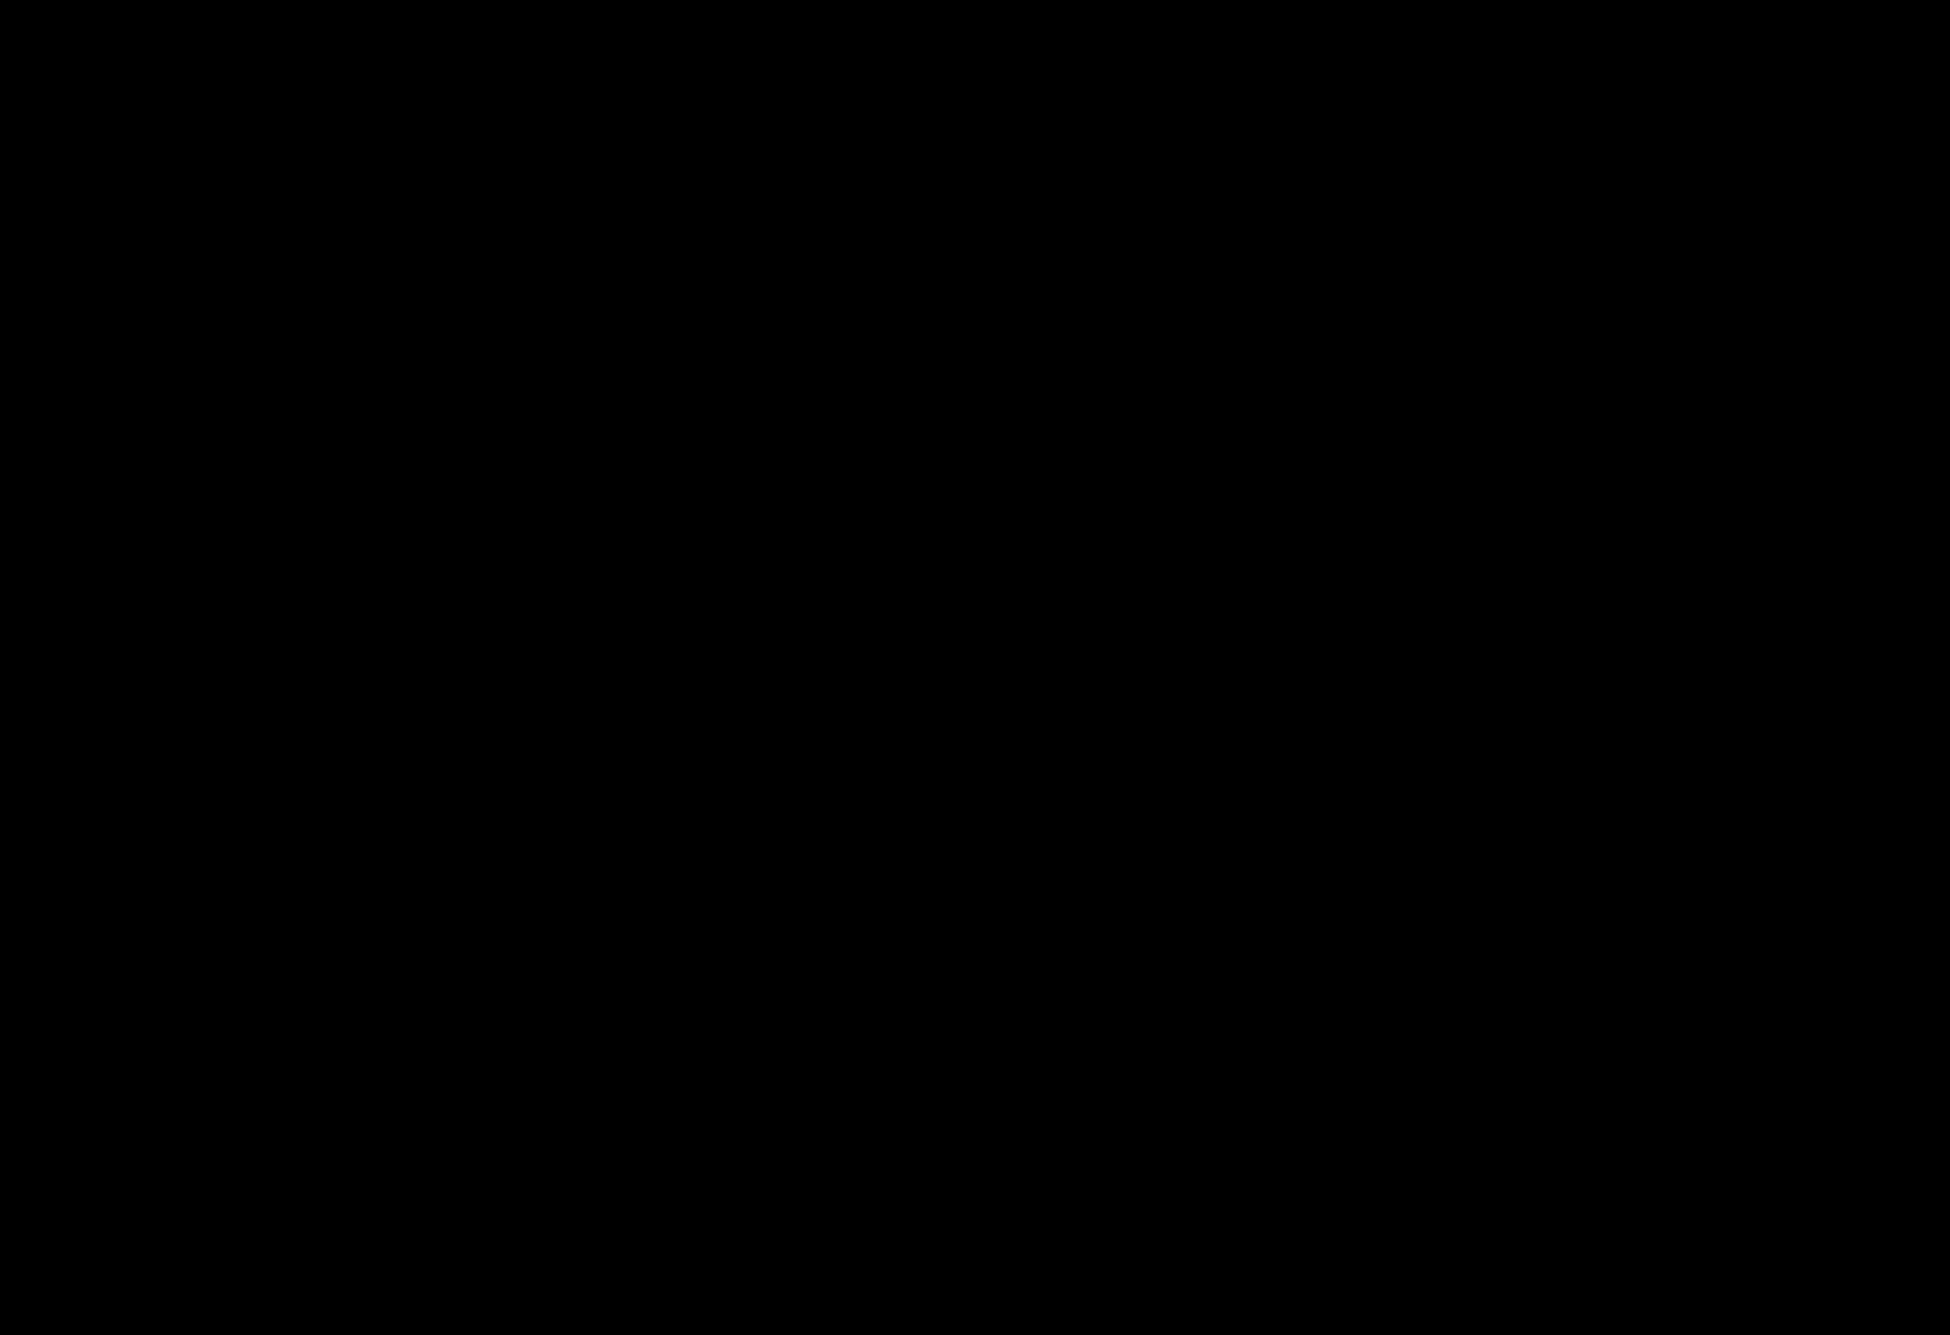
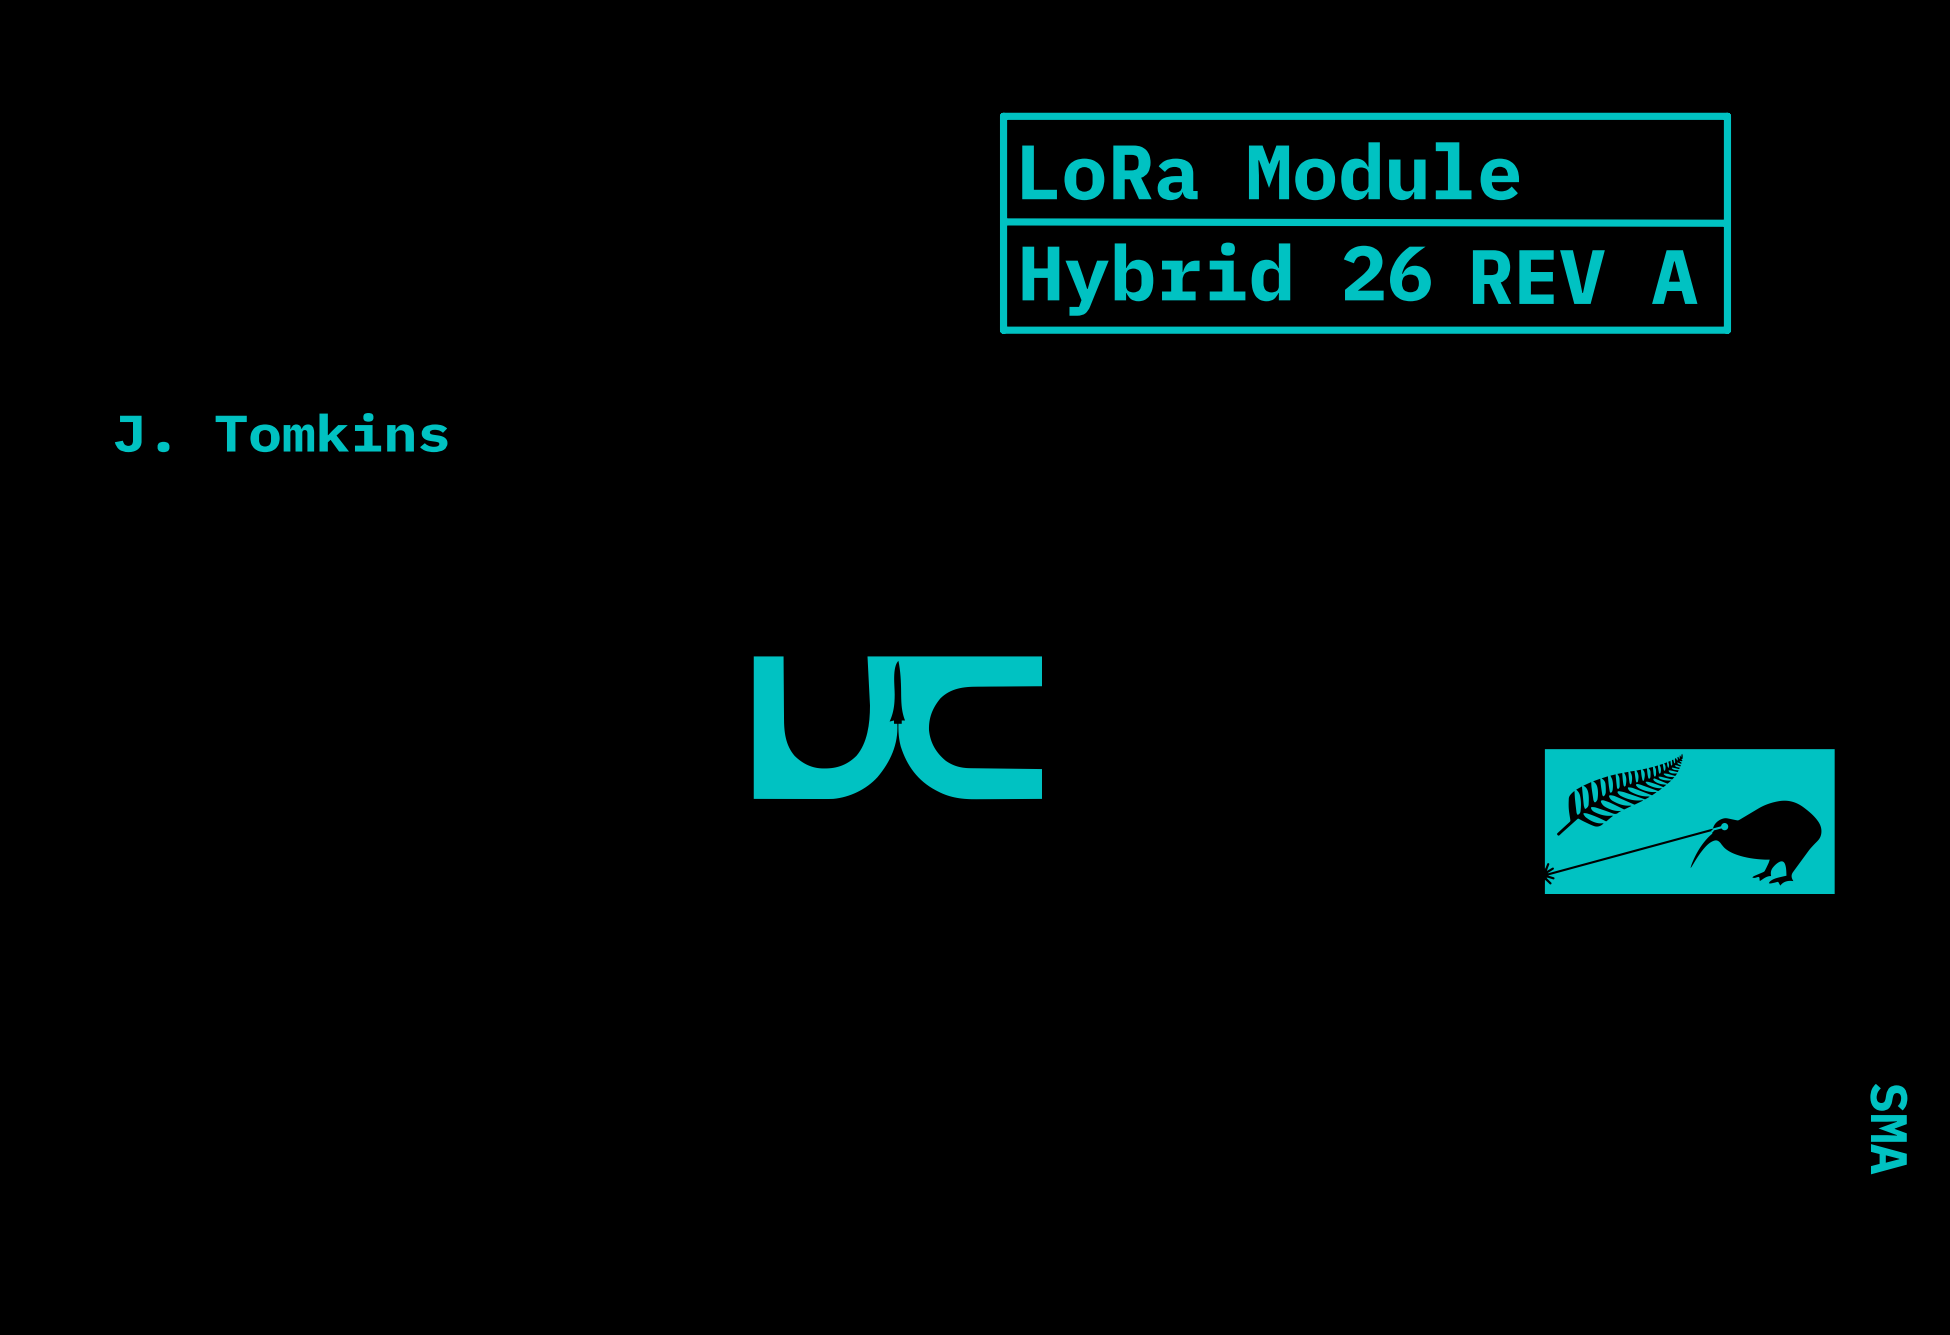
line: none -> (1003, 116) (1727, 116) (1727, 330) (1003, 330) (1003, 116)
text: none -> LoRa Module (1270, 171)
line: none -> (1003, 221) (1727, 223)
text: none -> REV A (1585, 277)
text: none -> Hybrid 26 (1226, 279)
text: none -> J. Tomkins (281, 432)
drawing: none -> [753, 656, 1042, 800]
drawing: none -> [1544, 749, 1835, 895]
text: none -> SMA (1888, 1129)

